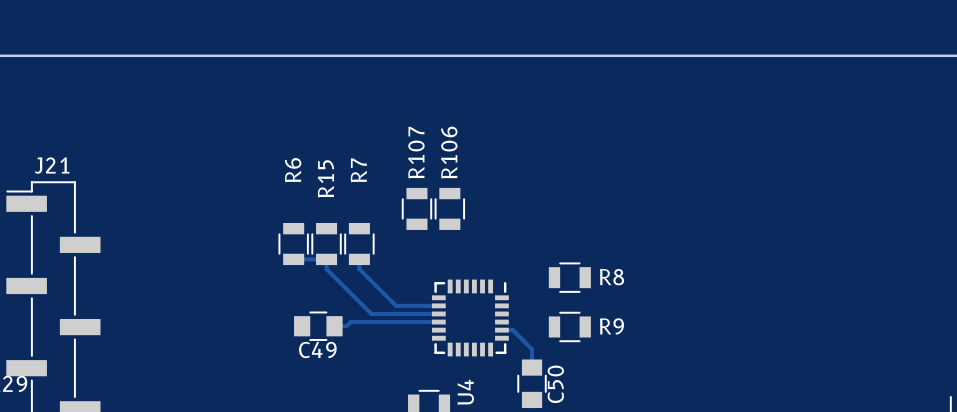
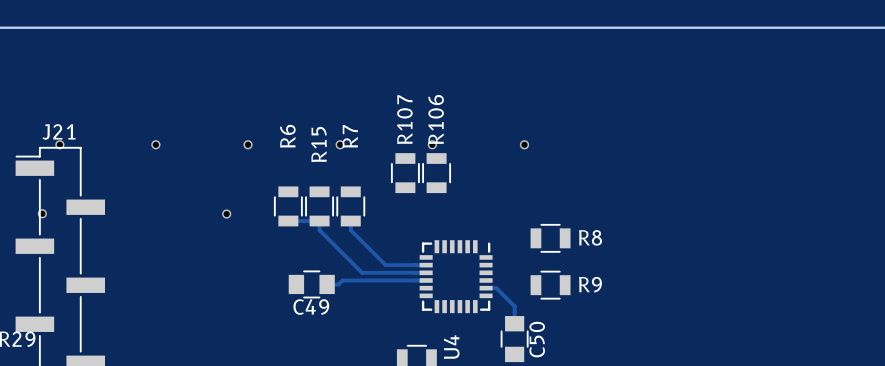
via: none -> (59, 144)
via: none -> (155, 144)
via: none -> (248, 144)
via: none -> (340, 144)
via: none -> (432, 144)
via: none -> (524, 144)
via: none -> (42, 213)
via: none -> (226, 214)

